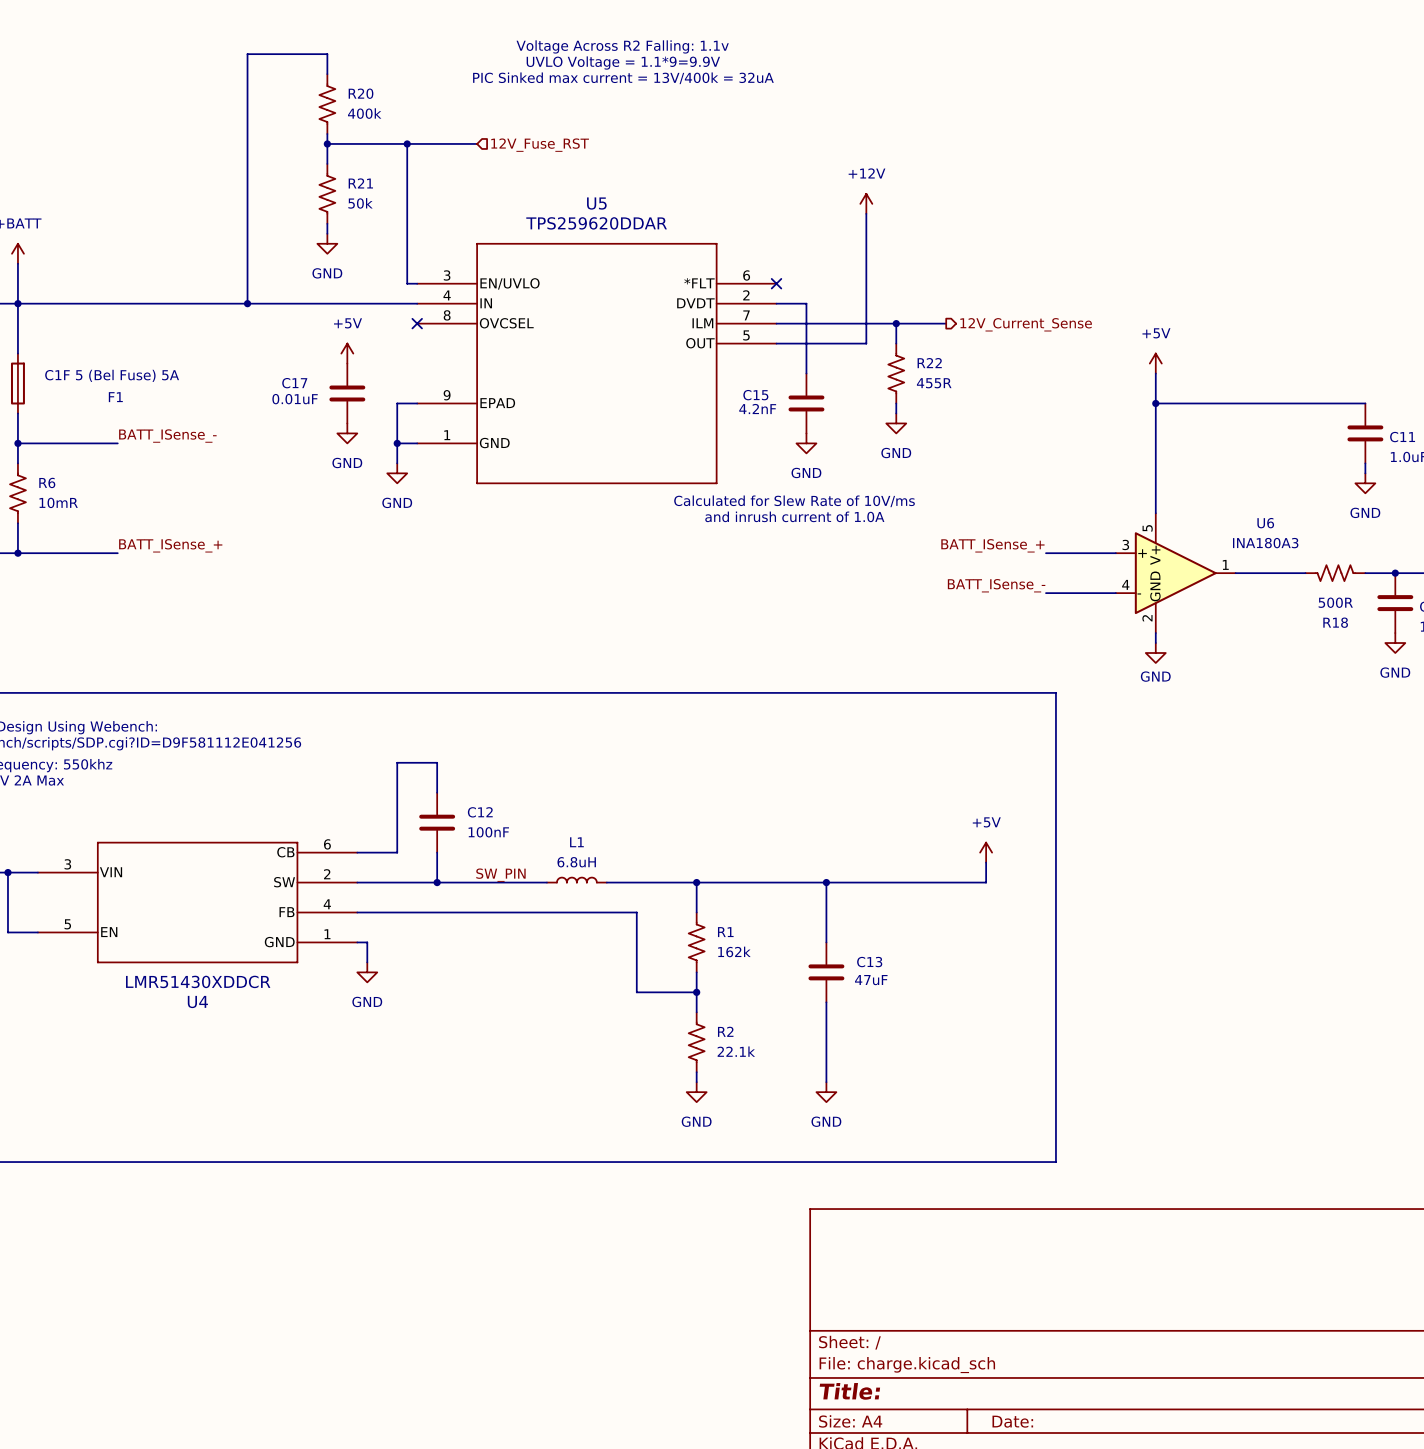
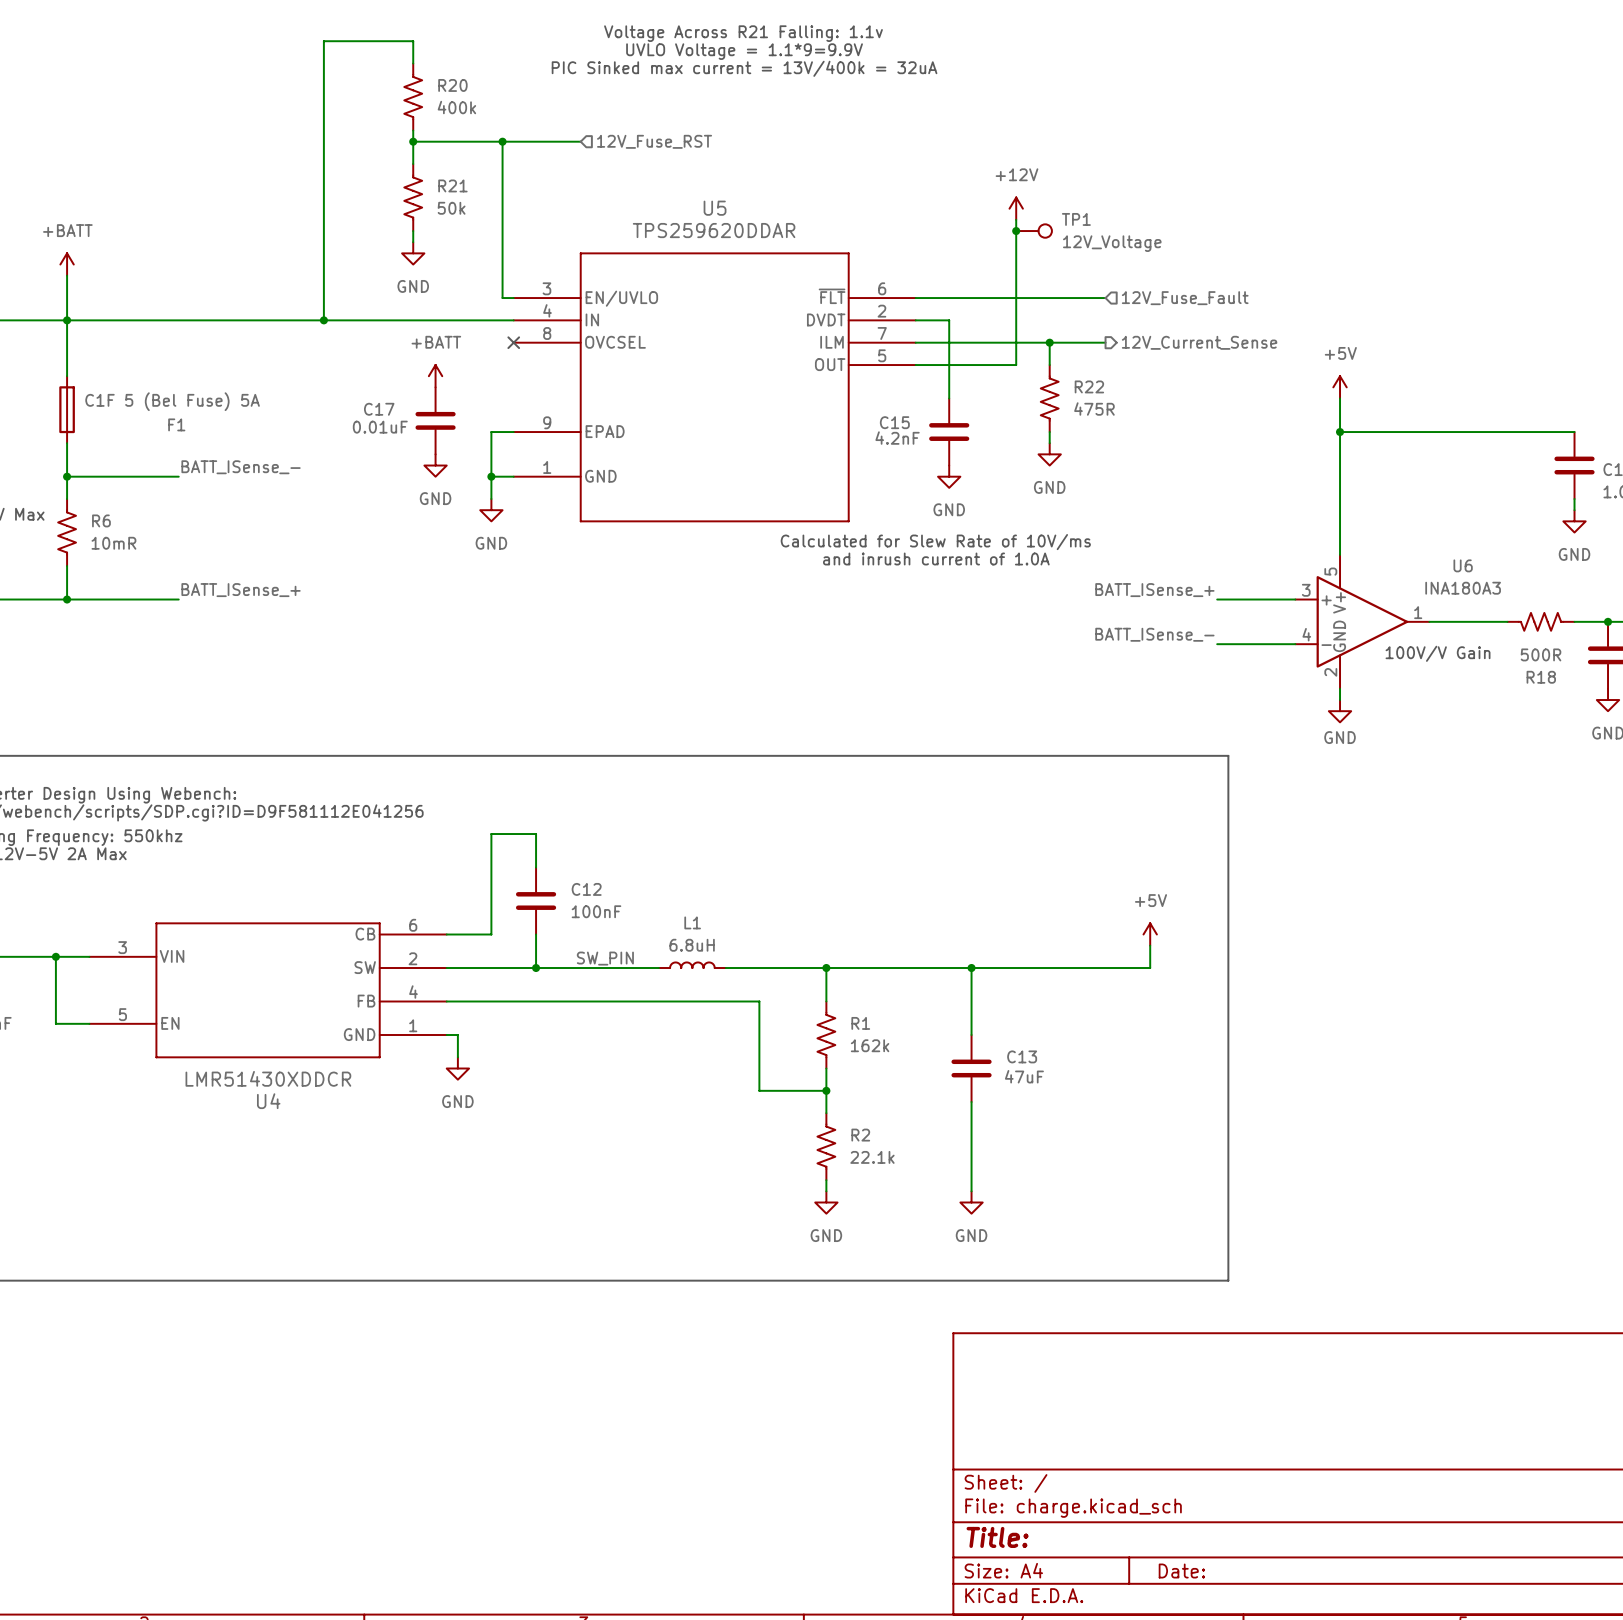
text: Voltage Across R2 Falling: 1.1v (622, 46) -> Voltage Across R21 Falling: 1.1v (743, 33)
junction: none -> (1016, 231)
TP1: none -> 12V_Voltage (1034, 231)
U5 pin name: *FLT (699, 283) -> ~{FLT} (832, 296)
wire: none -> (915, 298) (1105, 298)
no-connect mark: (776, 283) -> none
hierarchical label: none -> 12V_Fuse_Fault (1185, 298)
power symbol: +5V (347, 353) -> +BATT (435, 376)
R22 value: 455R (934, 383) -> 475R (1094, 409)
text: none -> 100V/V Gain (1438, 653)

